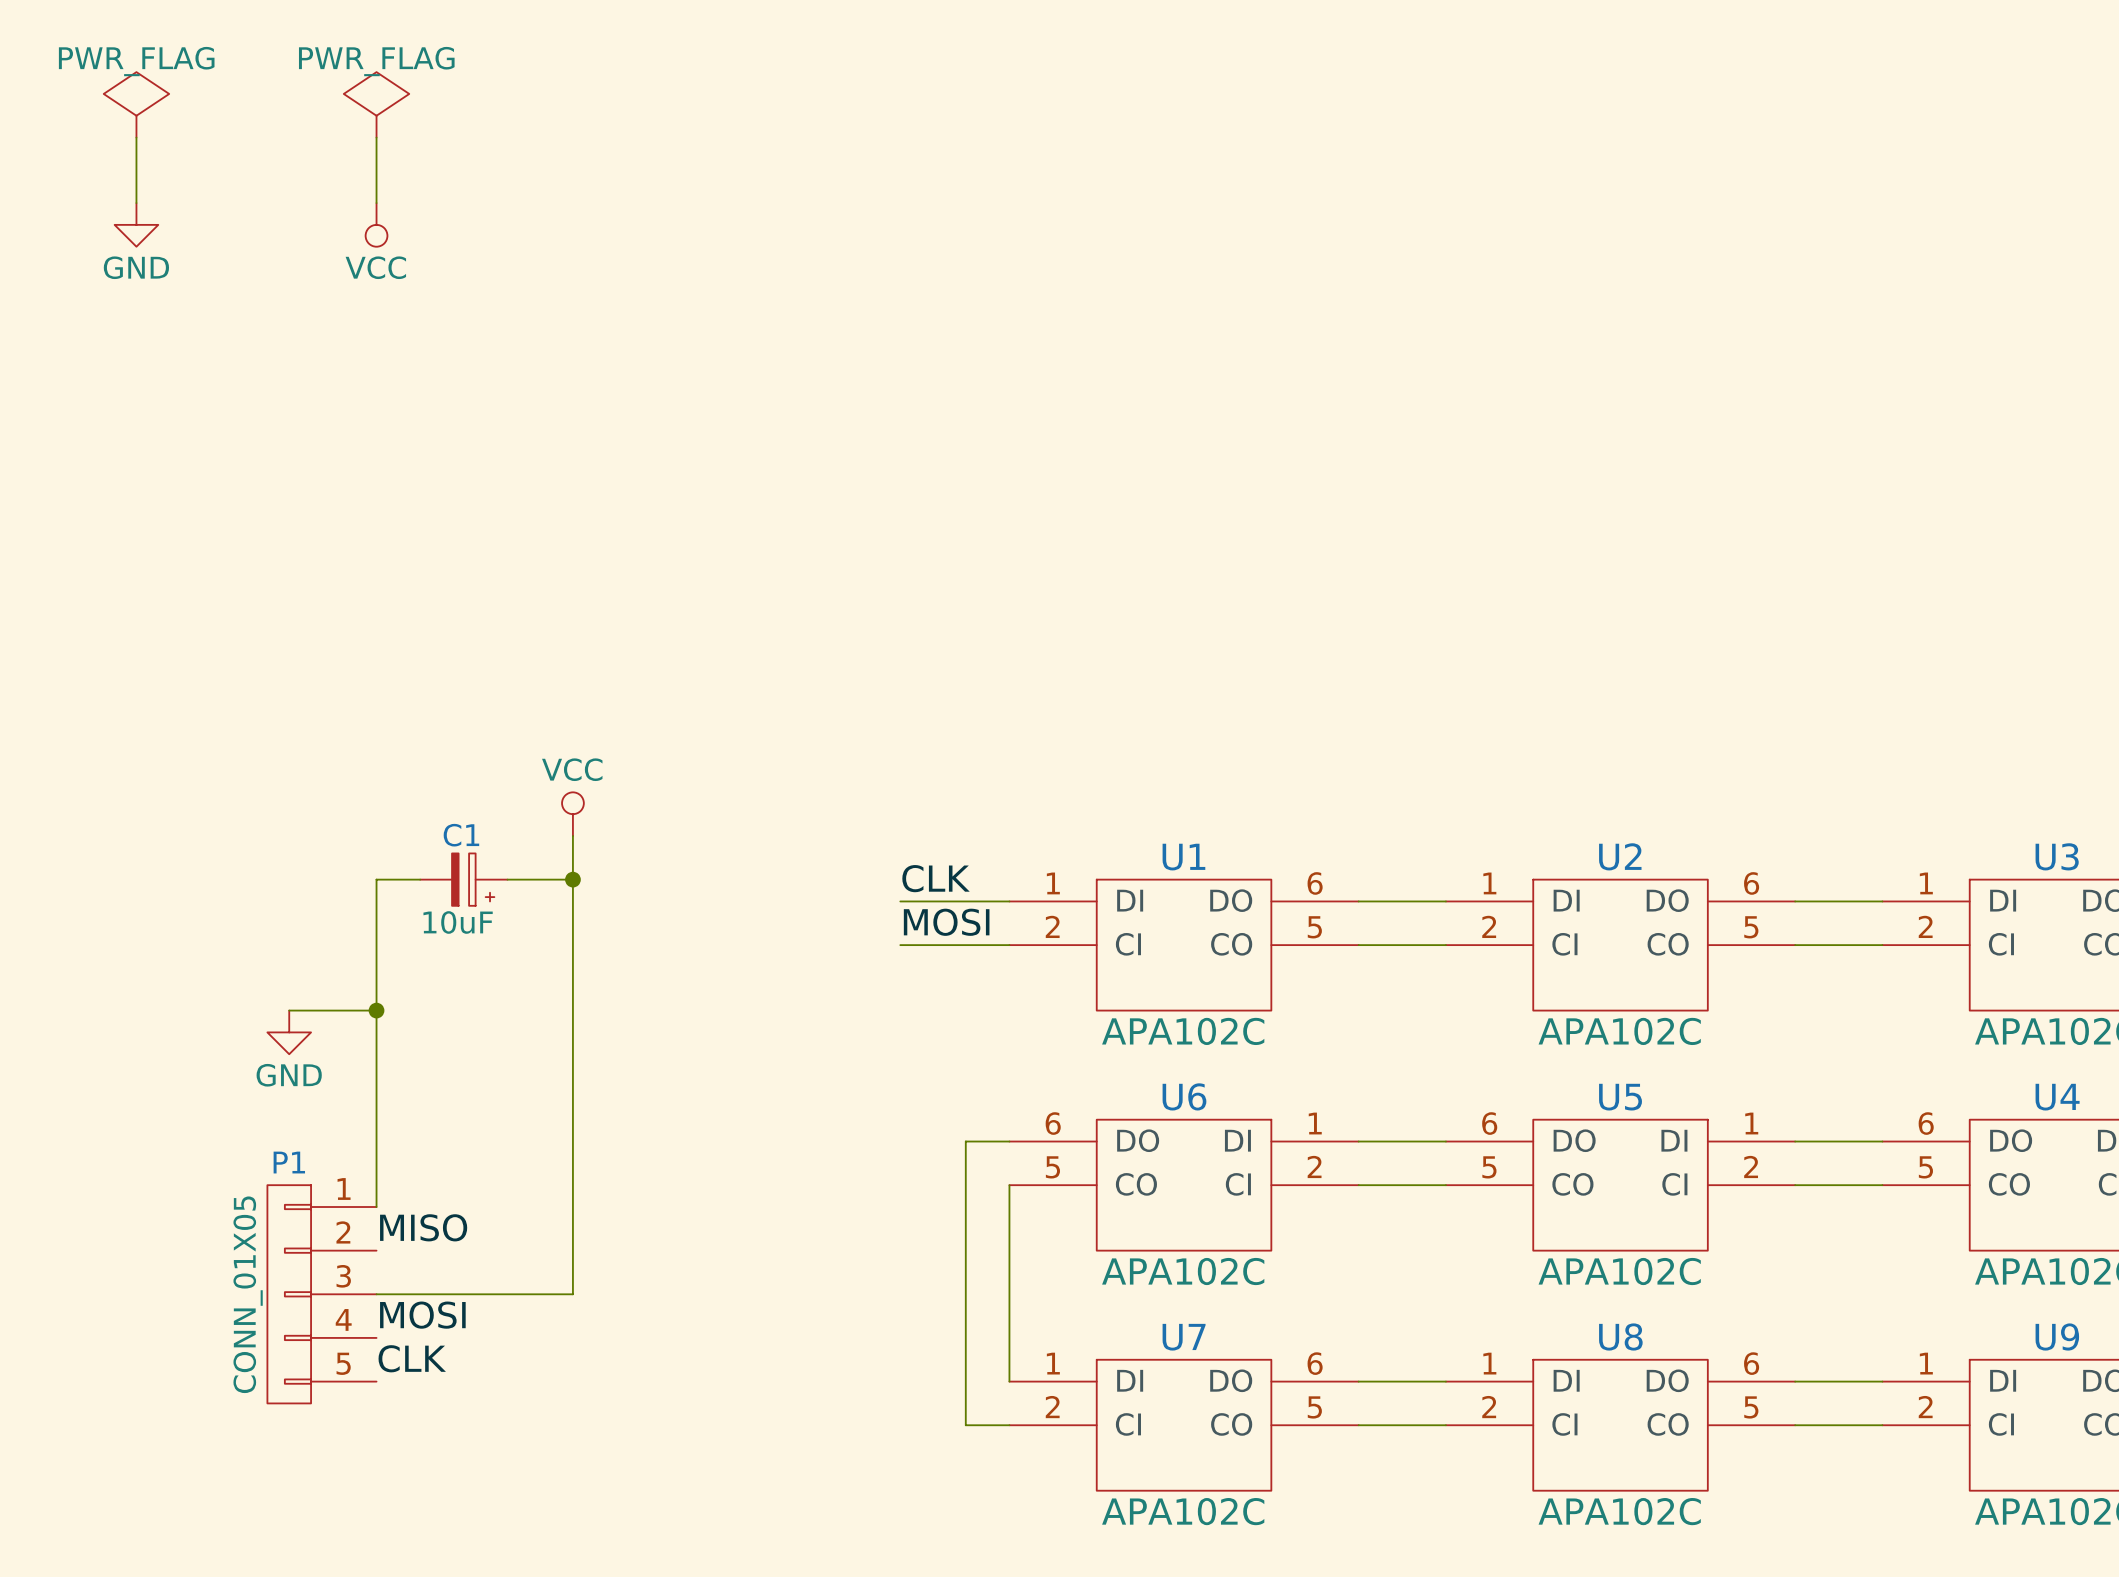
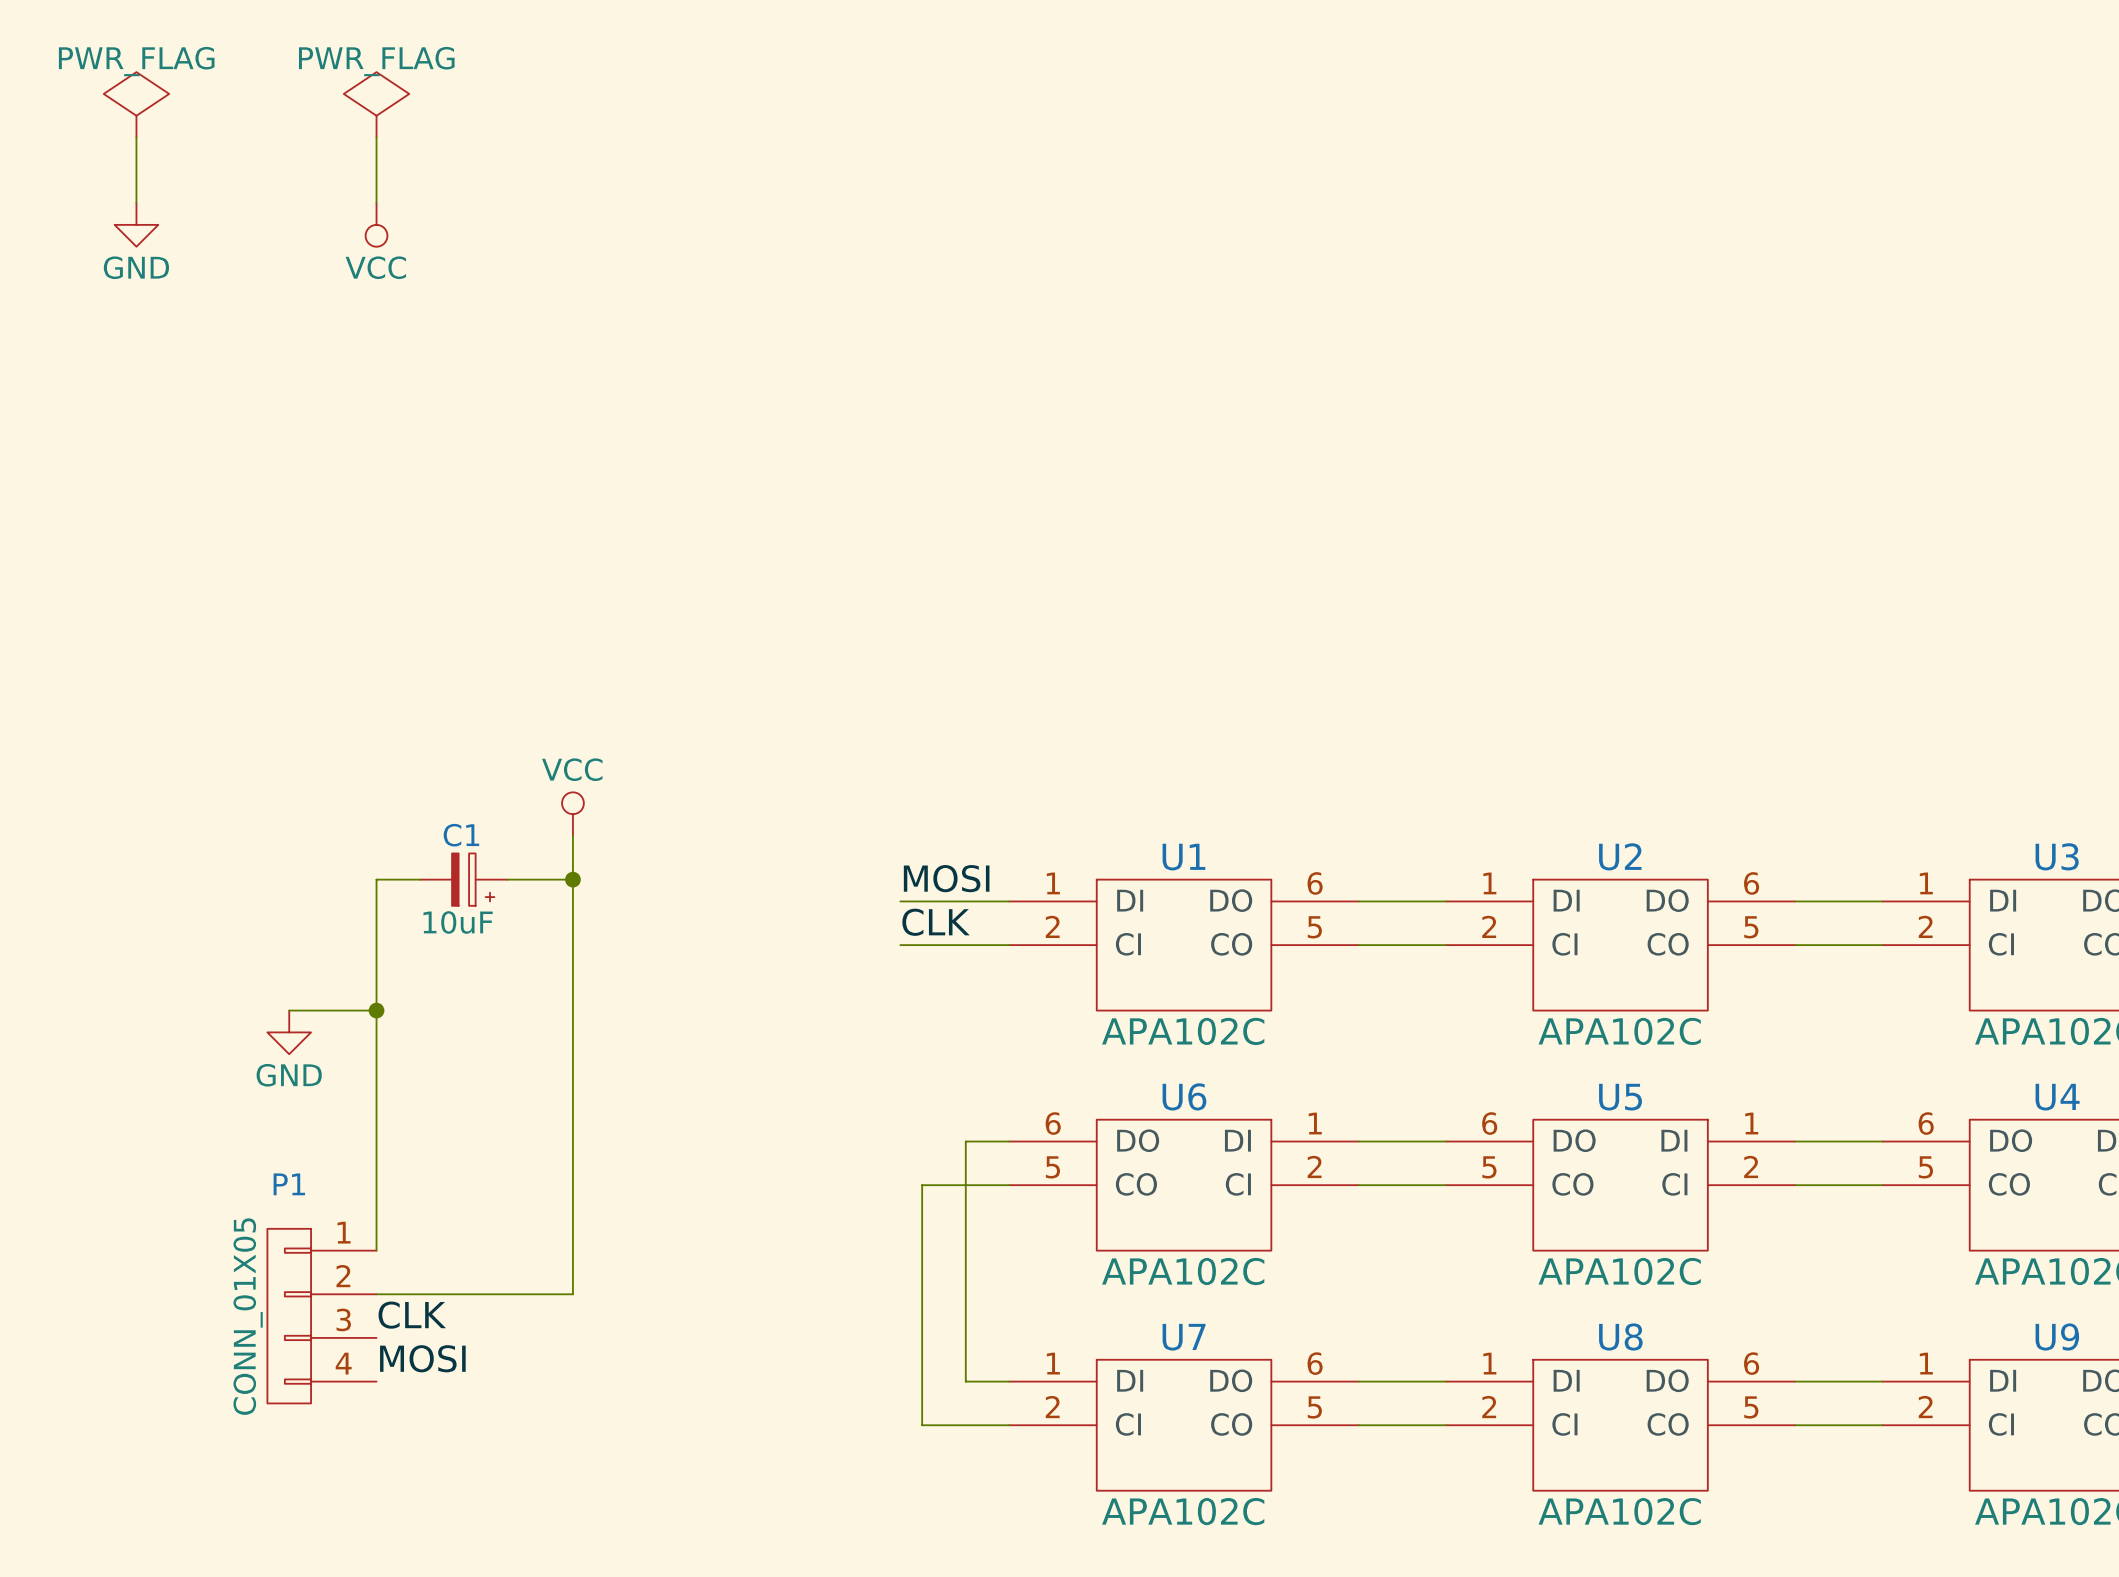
label: CLK (936, 878) -> MOSI (946, 878)
label: MOSI (946, 922) -> CLK (936, 922)
P1 symbol: [267, 1185, 377, 1404] -> [267, 1228, 377, 1404]
wire: (1009, 1185) (1009, 1381) -> (1009, 1185) (922, 1185) (922, 1425) (965, 1425)
wire: none -> (376, 1207) (376, 1250)
label: MISO (423, 1227) -> none
label: MOSI (422, 1315) -> CLK (412, 1315)
label: CLK (412, 1358) -> MOSI (422, 1358)
wire: (965, 1381) (965, 1425) -> (965, 1381) (1009, 1381)

